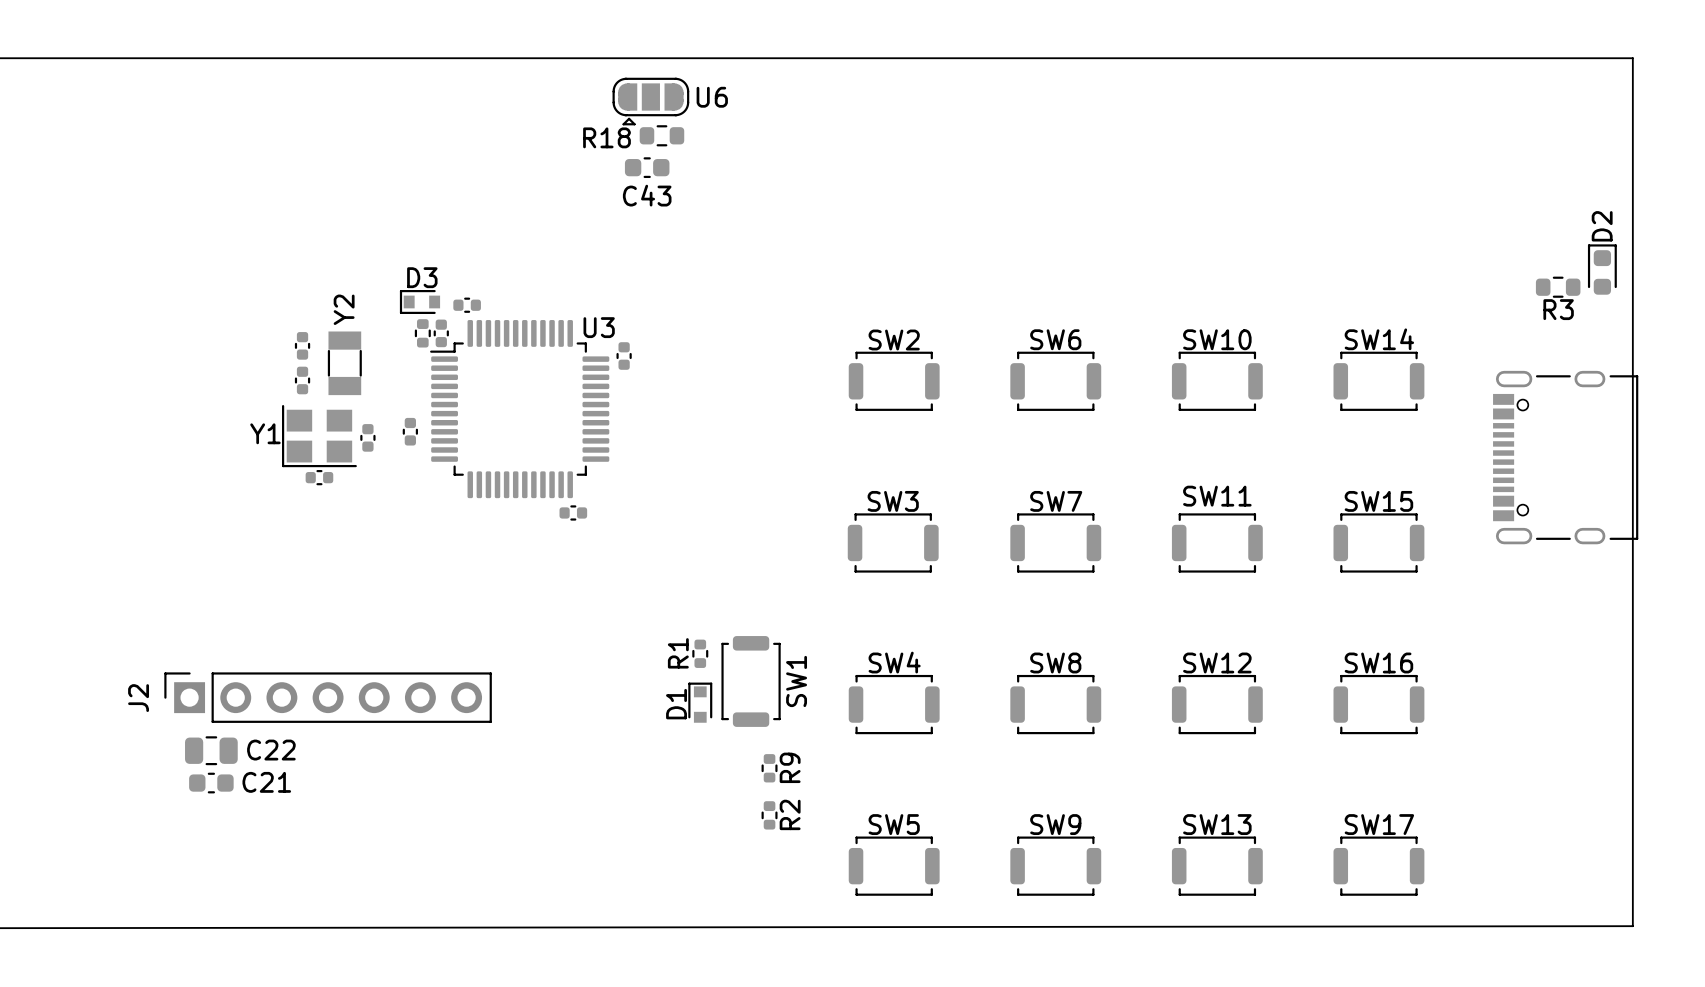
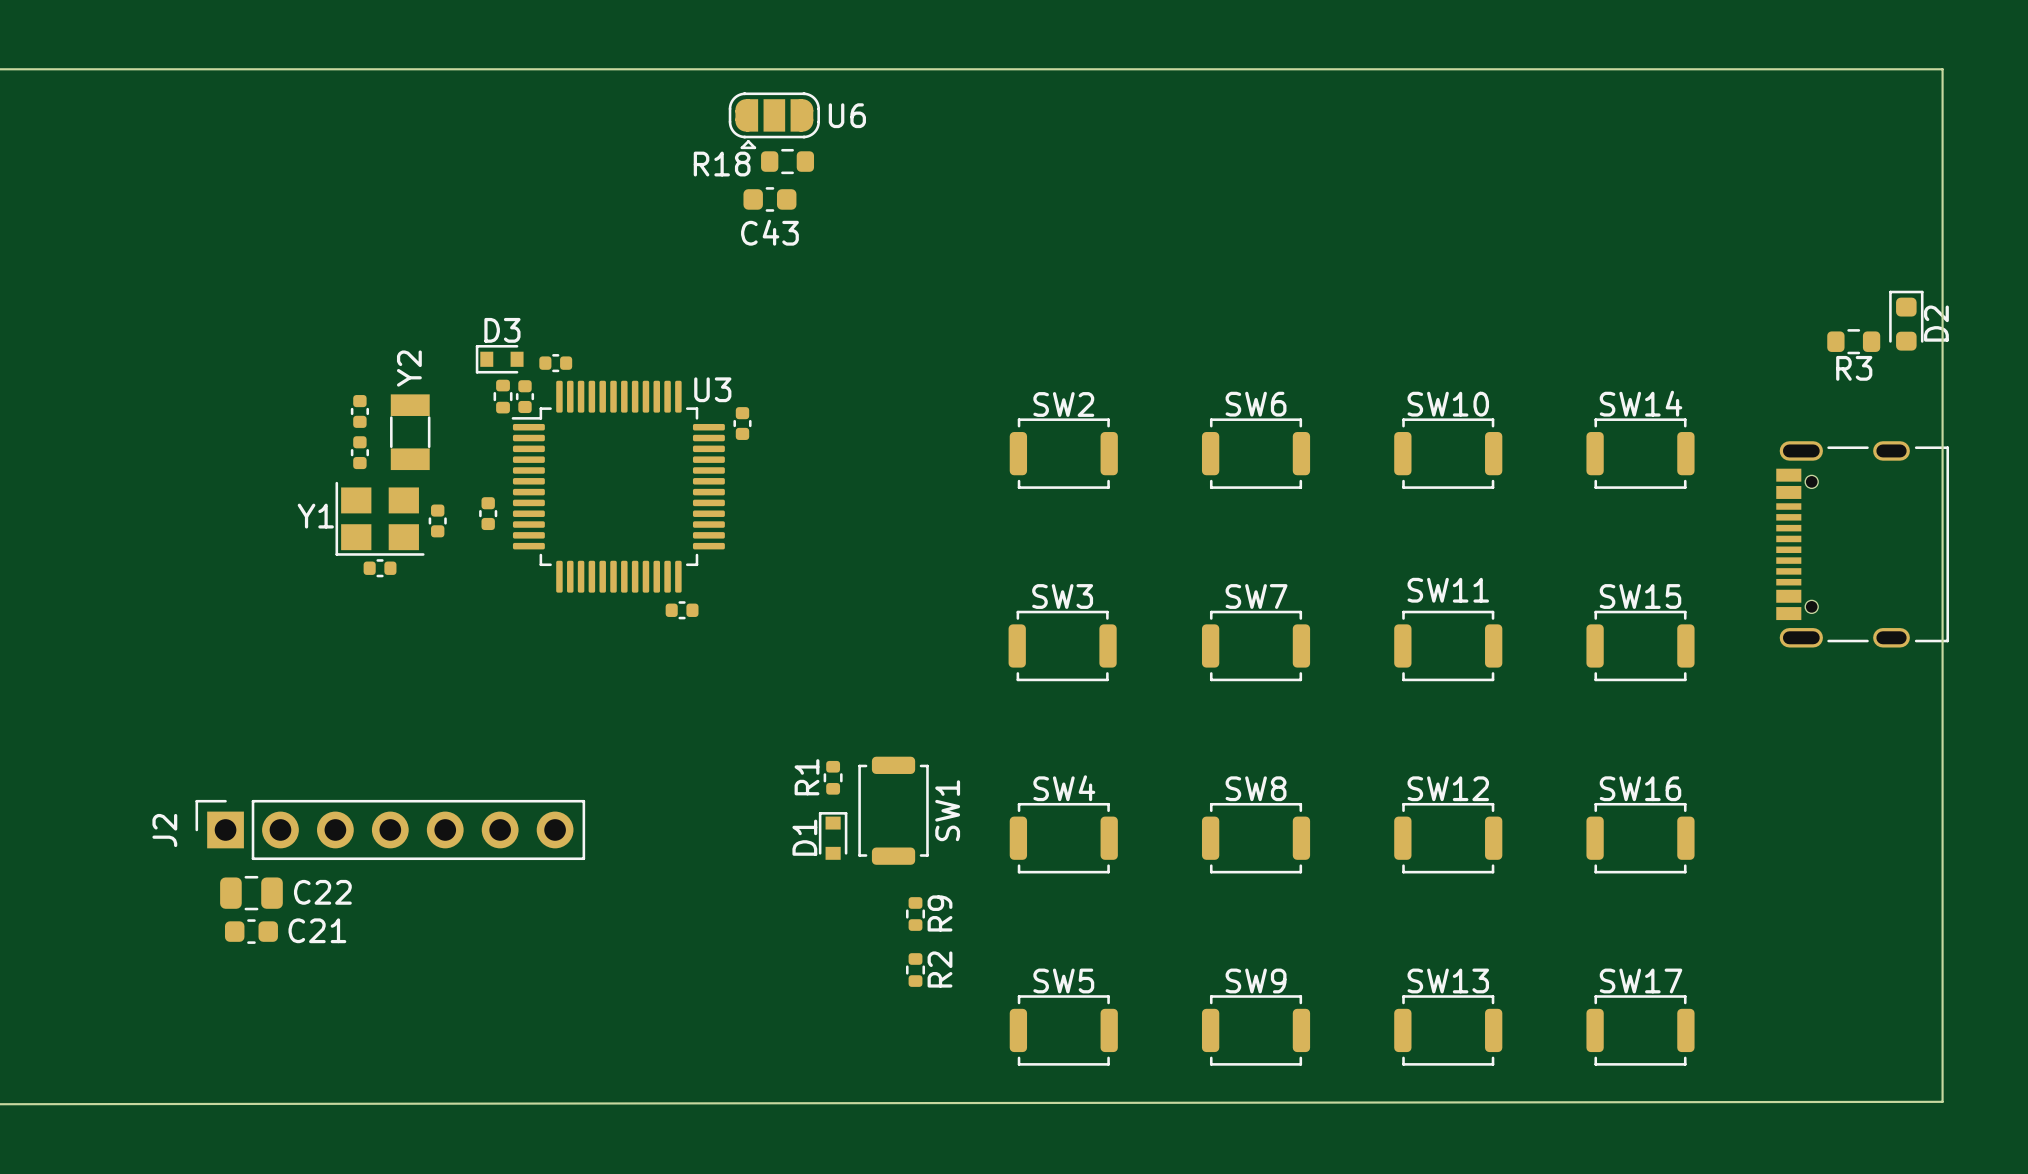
D2 name position: D2 (1602, 226) -> D2 (1936, 323)

